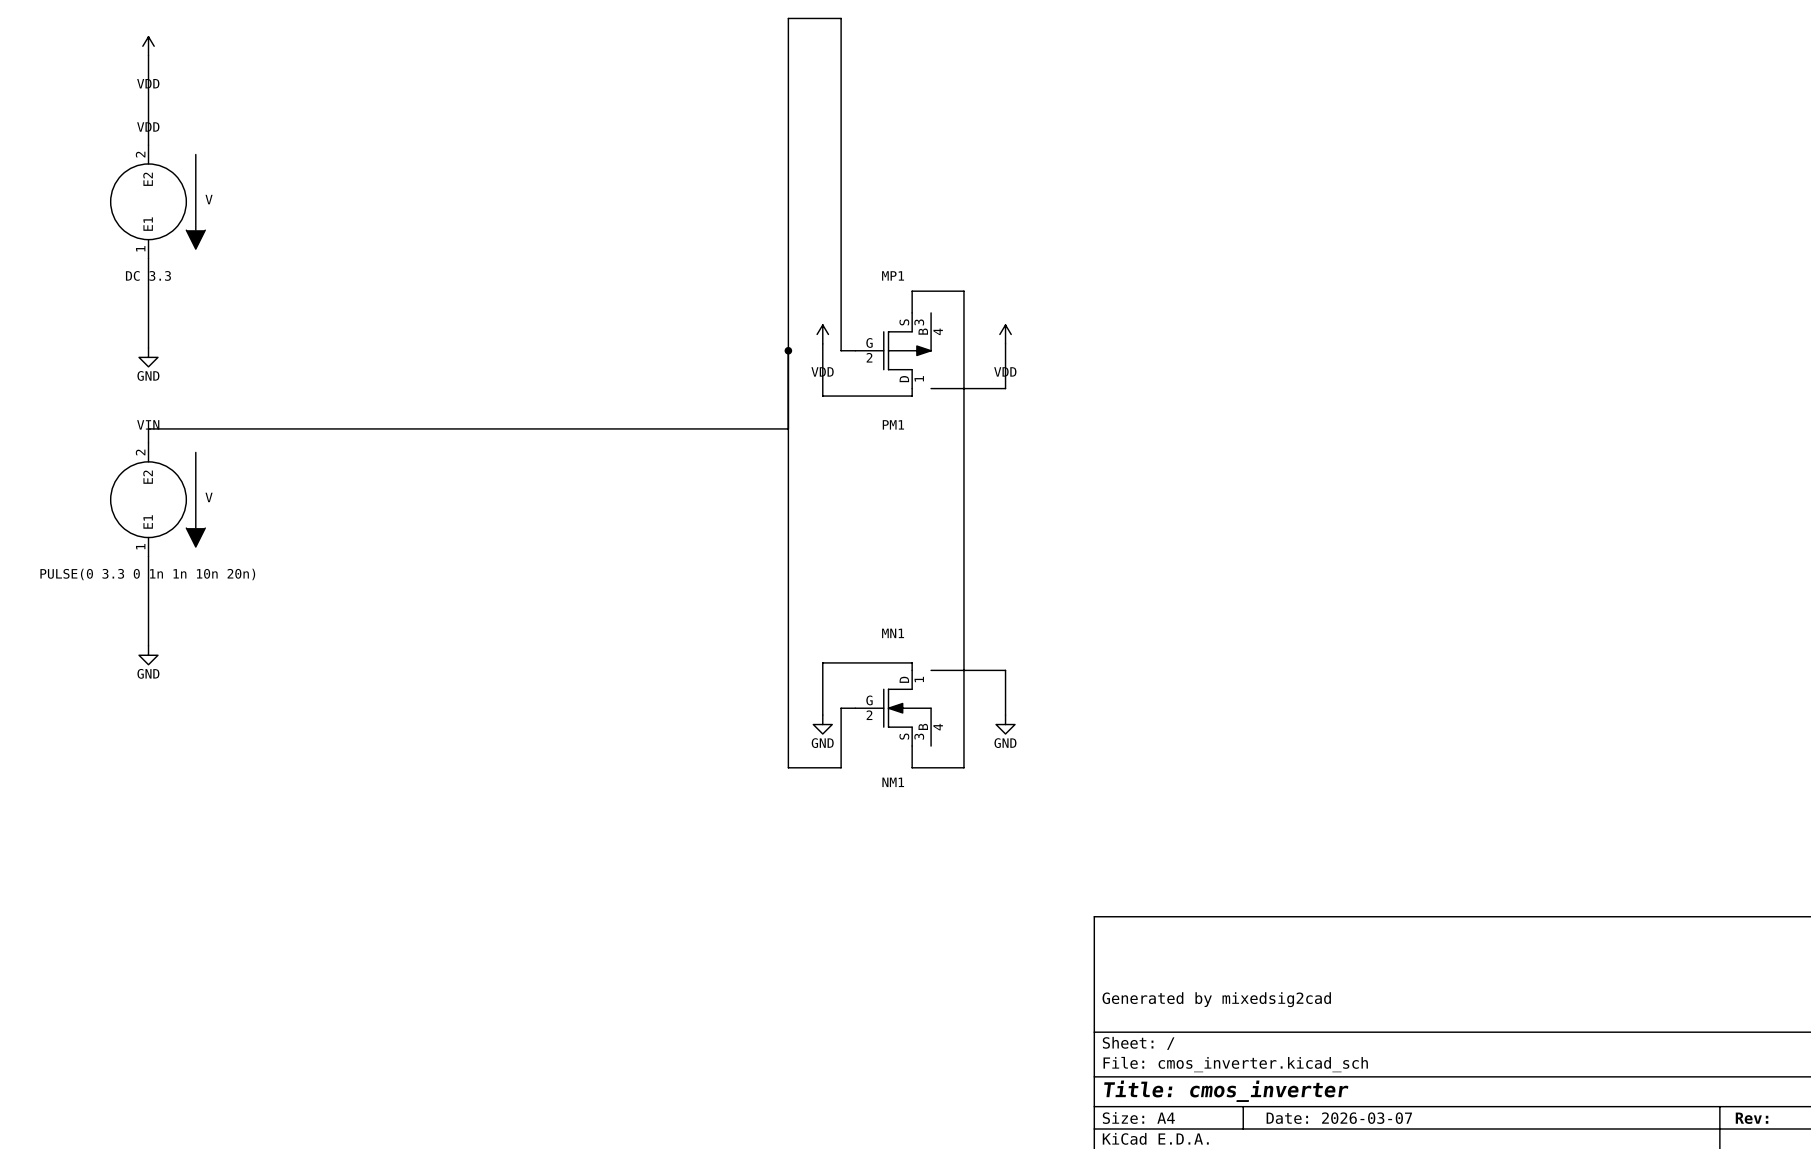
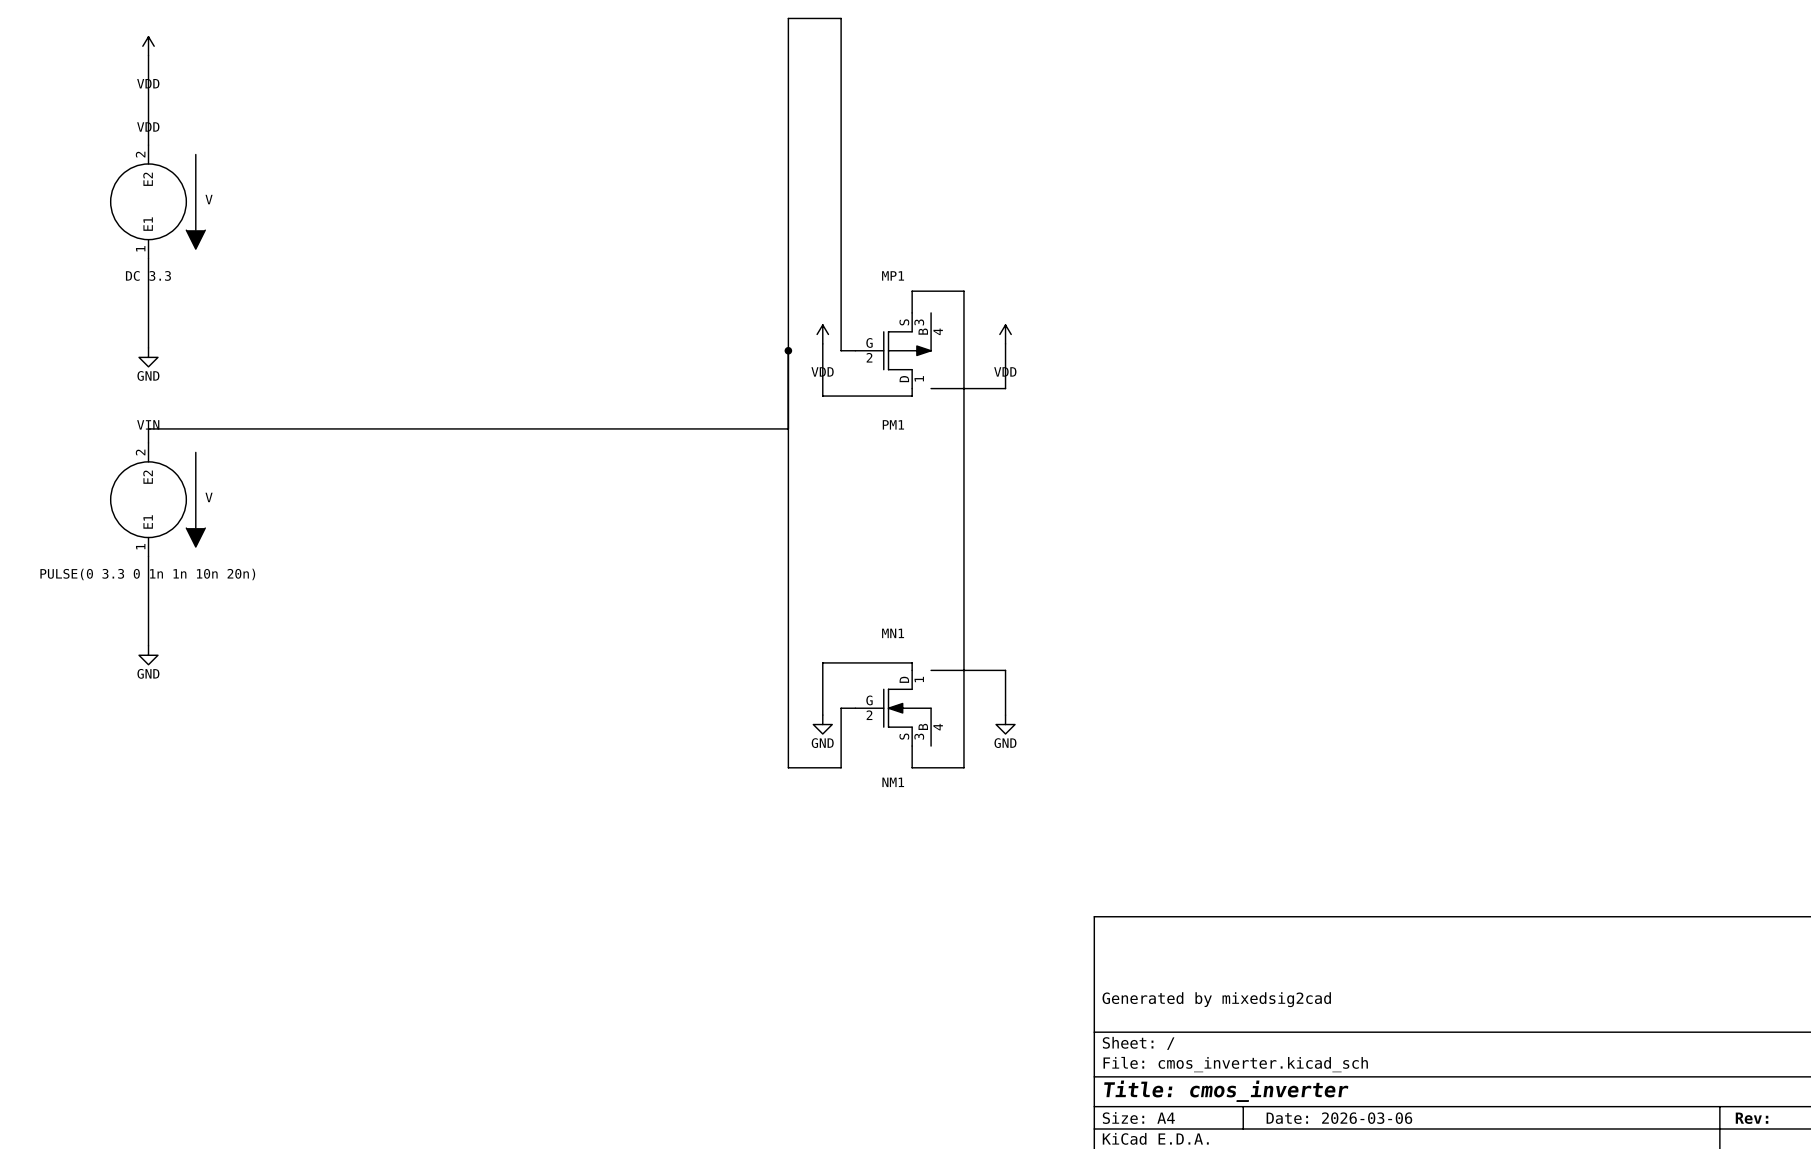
title block: Date: 2026-03-07 (1339, 1118) -> Date: 2026-03-06 (1339, 1118)

